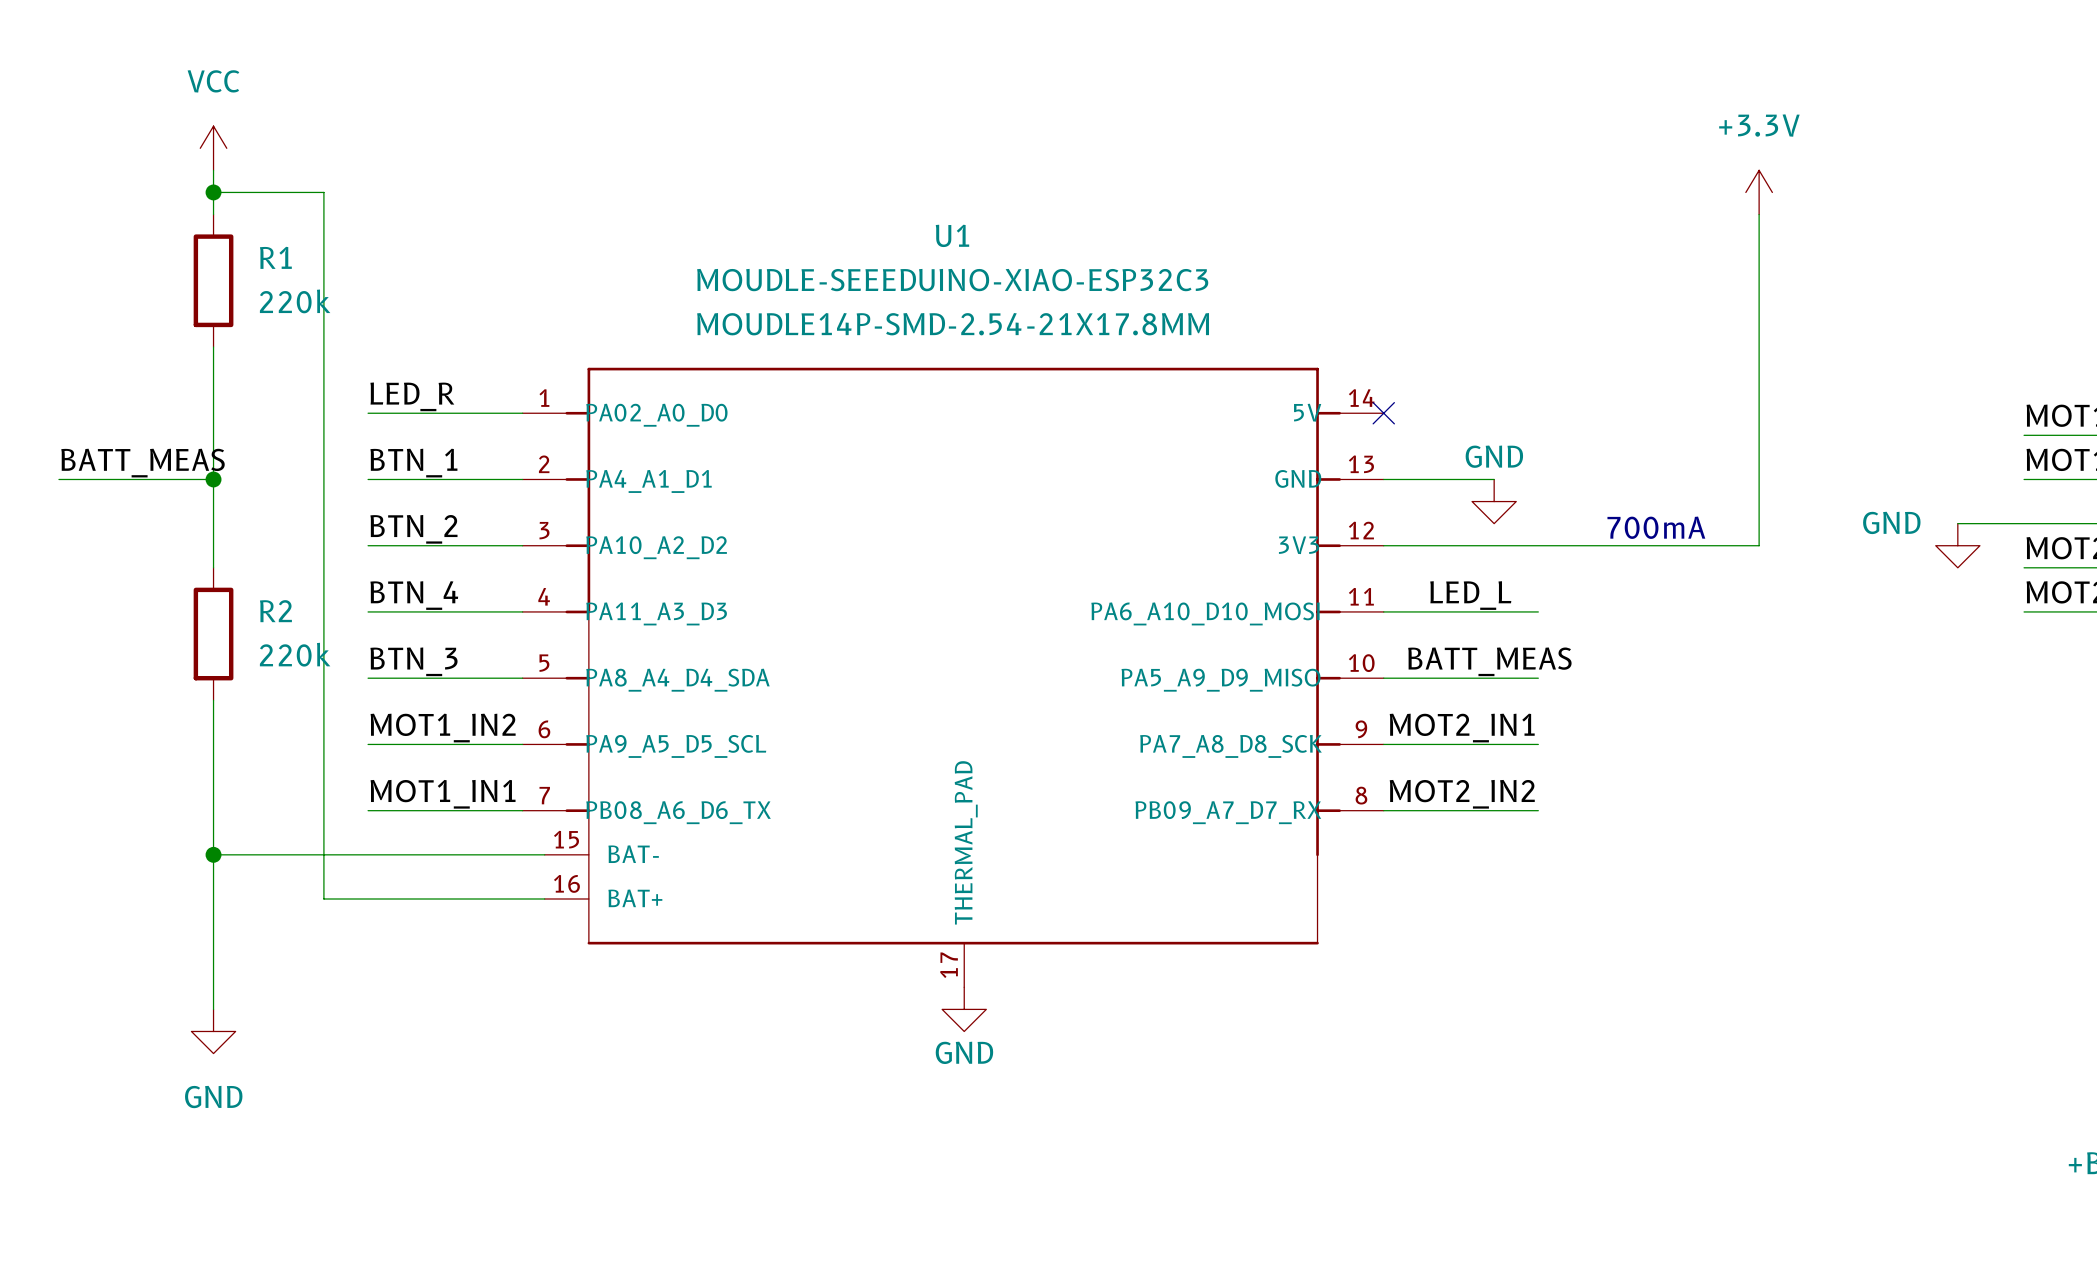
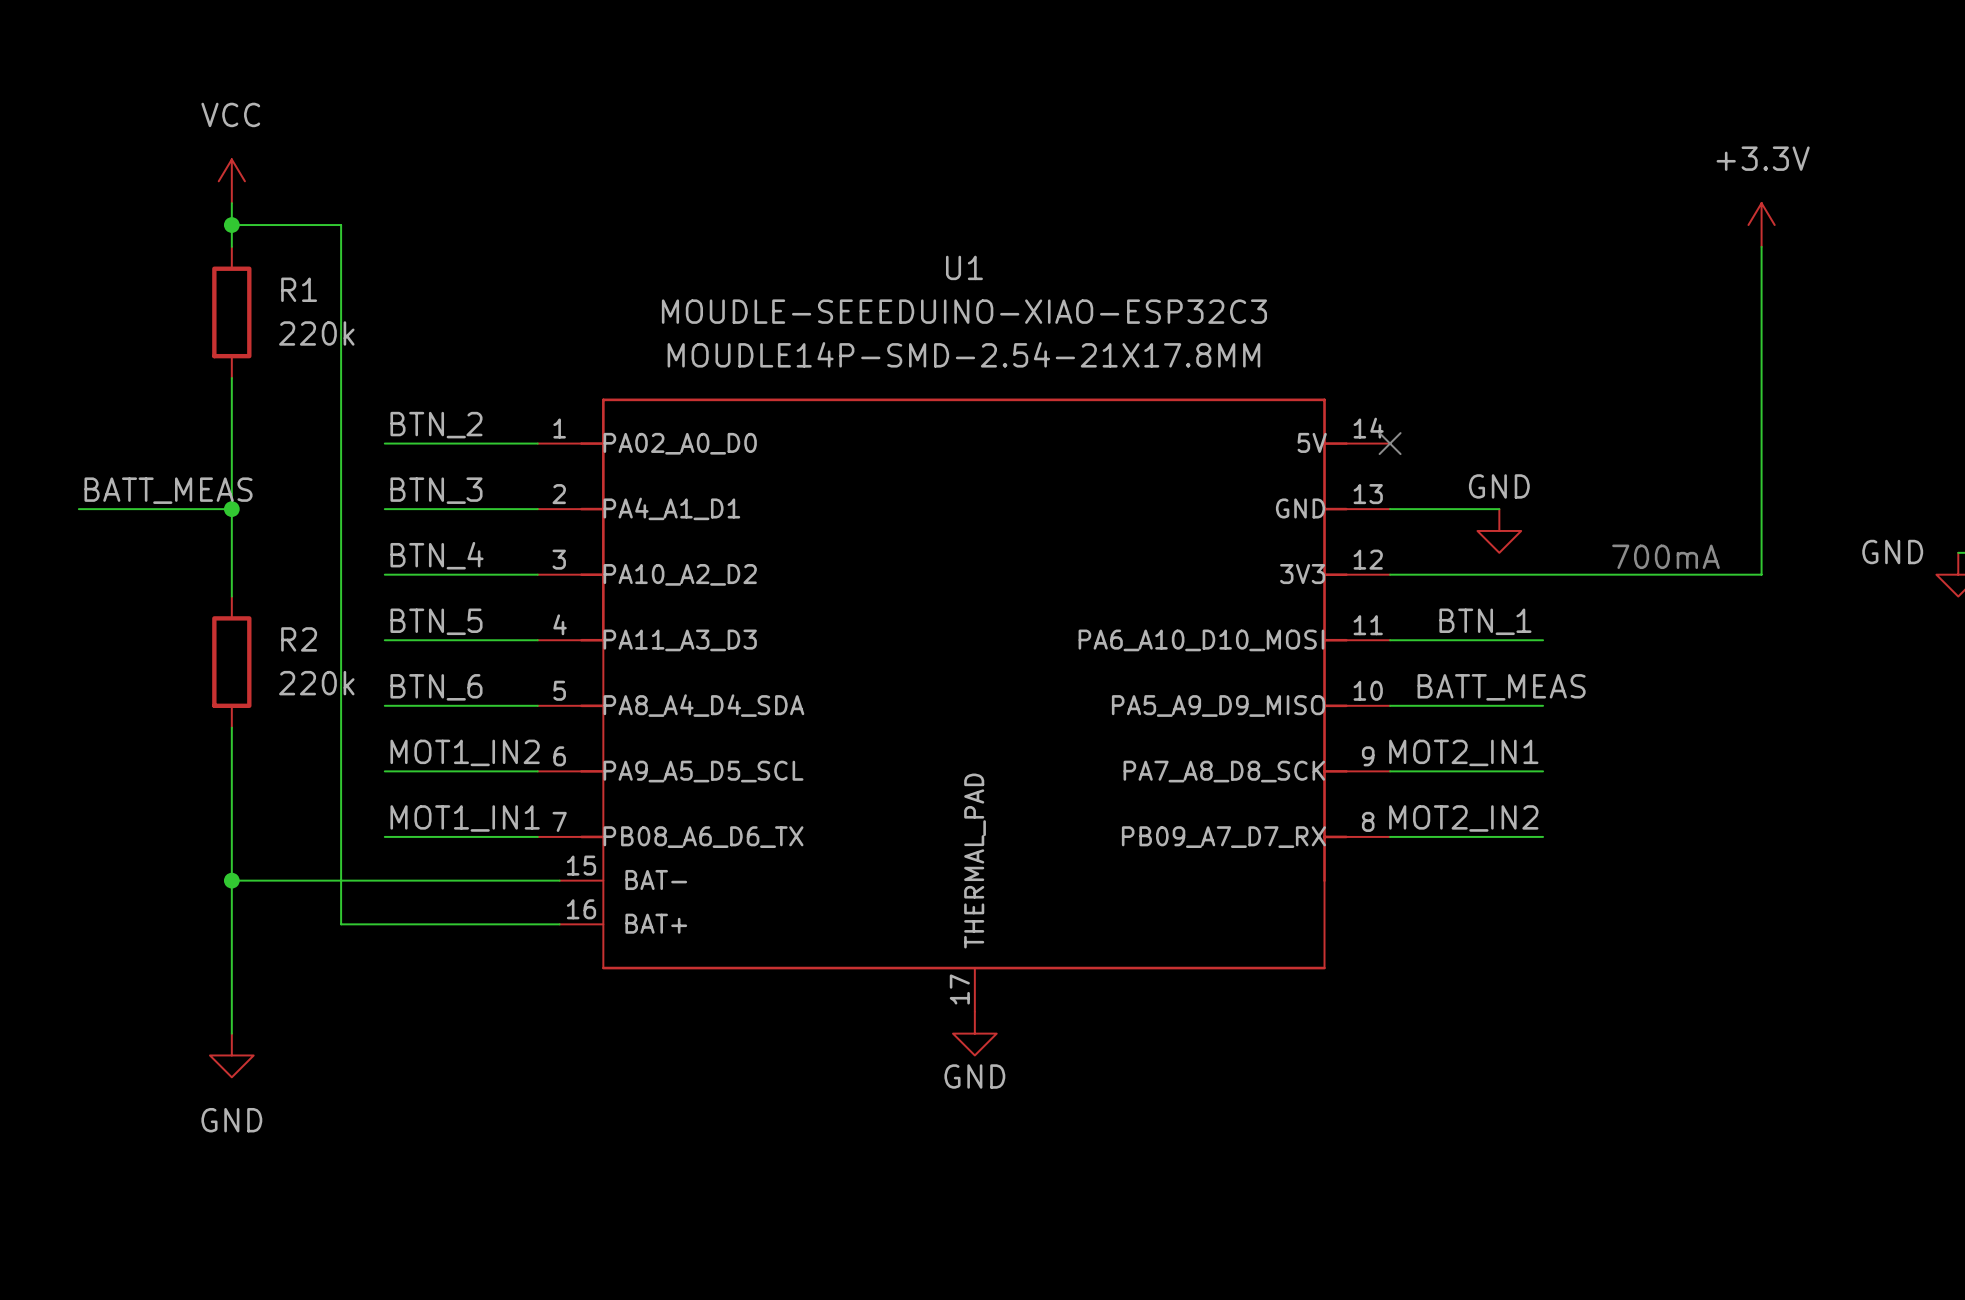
label: LED_R (412, 396) -> BTN_2 (436, 425)
label: BTN_1 (413, 463) -> BTN_3 (436, 490)
label: BTN_2 (413, 529) -> BTN_4 (437, 555)
label: BTN_4 (414, 595) -> BTN_5 (436, 621)
label: LED_L (1470, 595) -> BTN_1 (1485, 621)
label: BTN_3 (413, 661) -> BTN_6 (436, 687)

